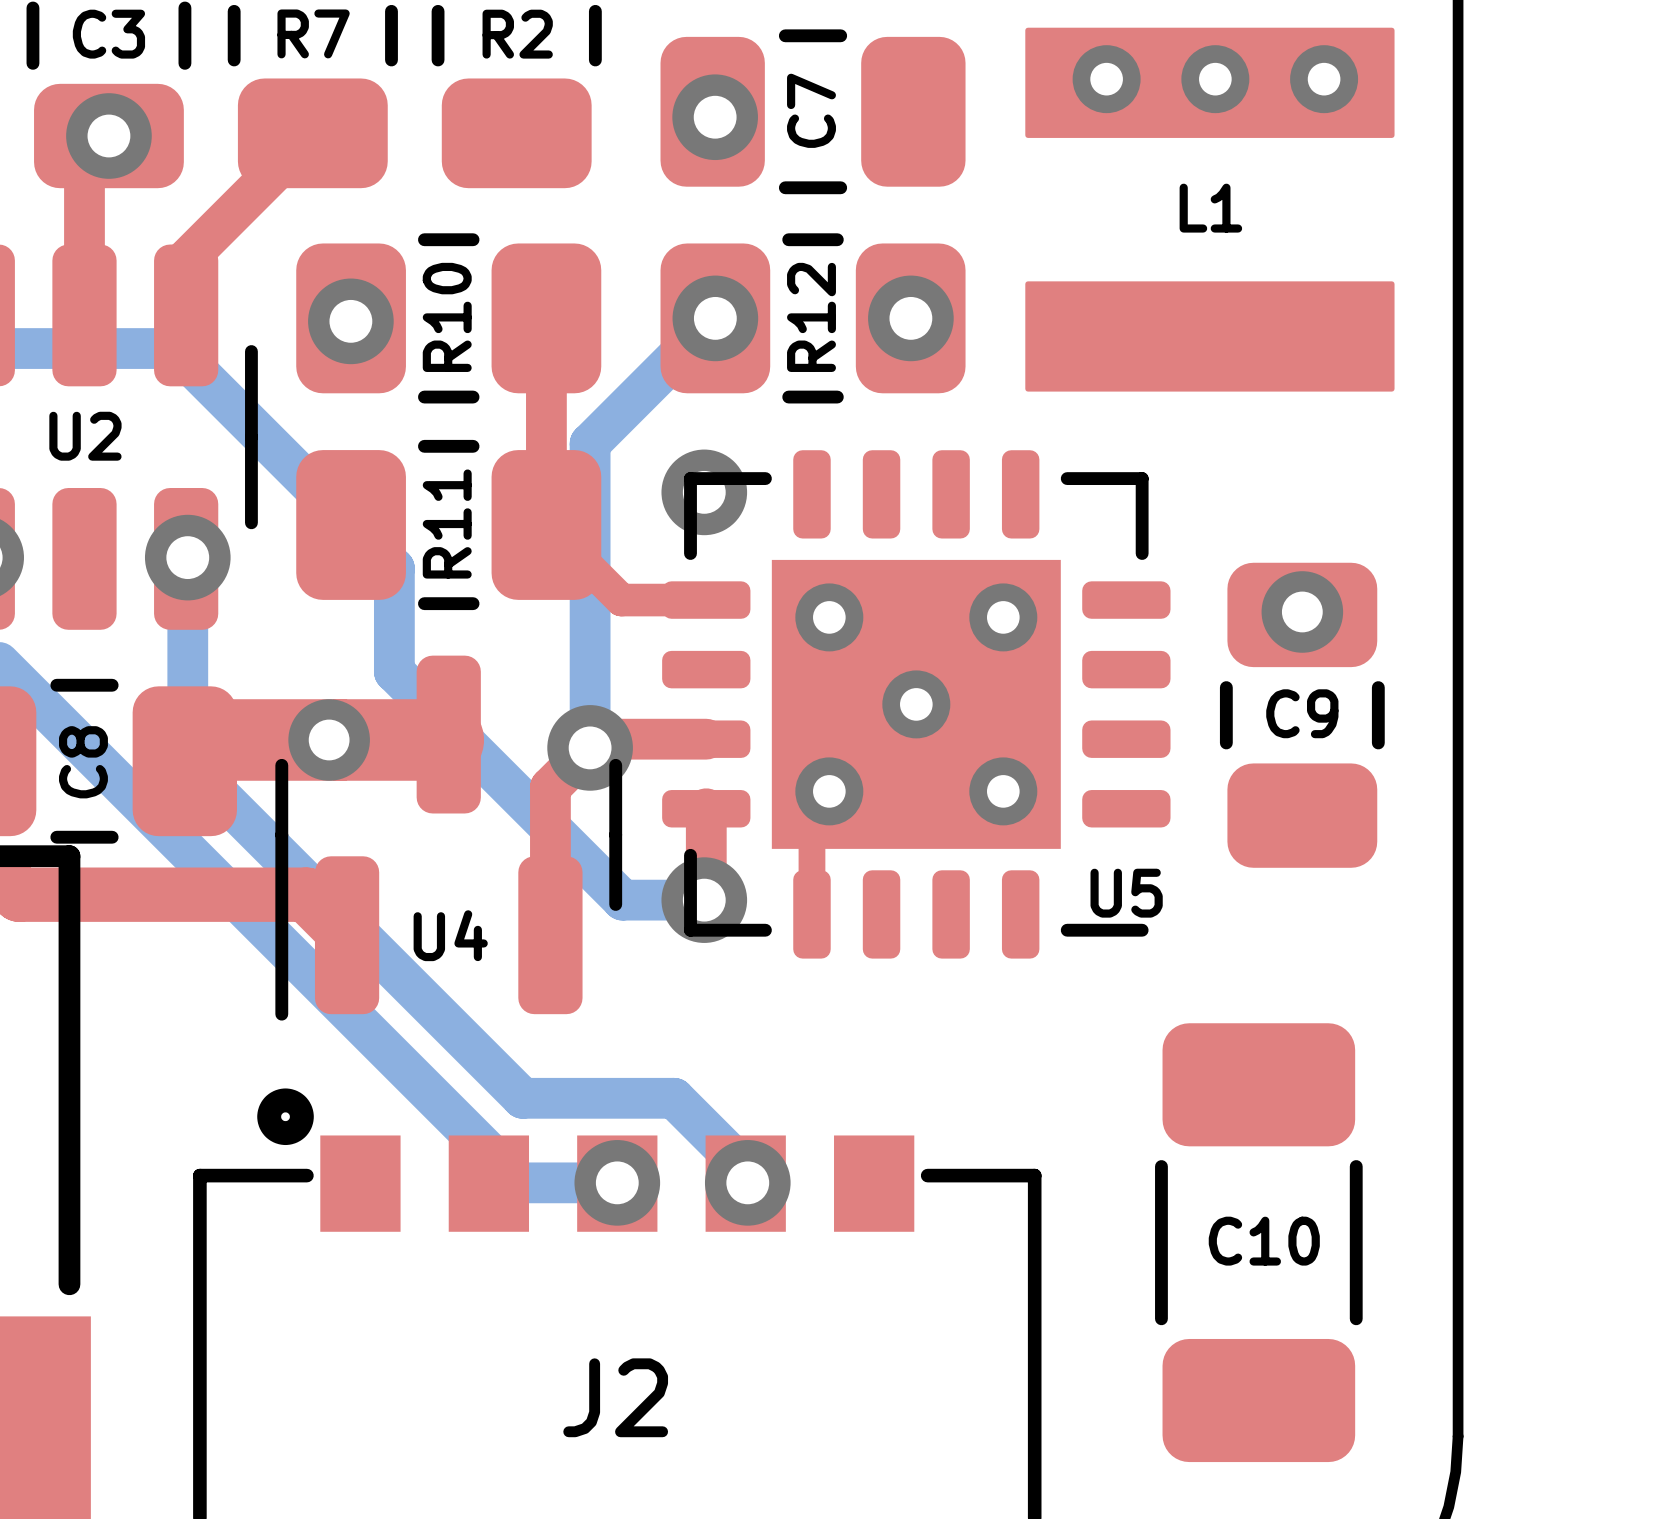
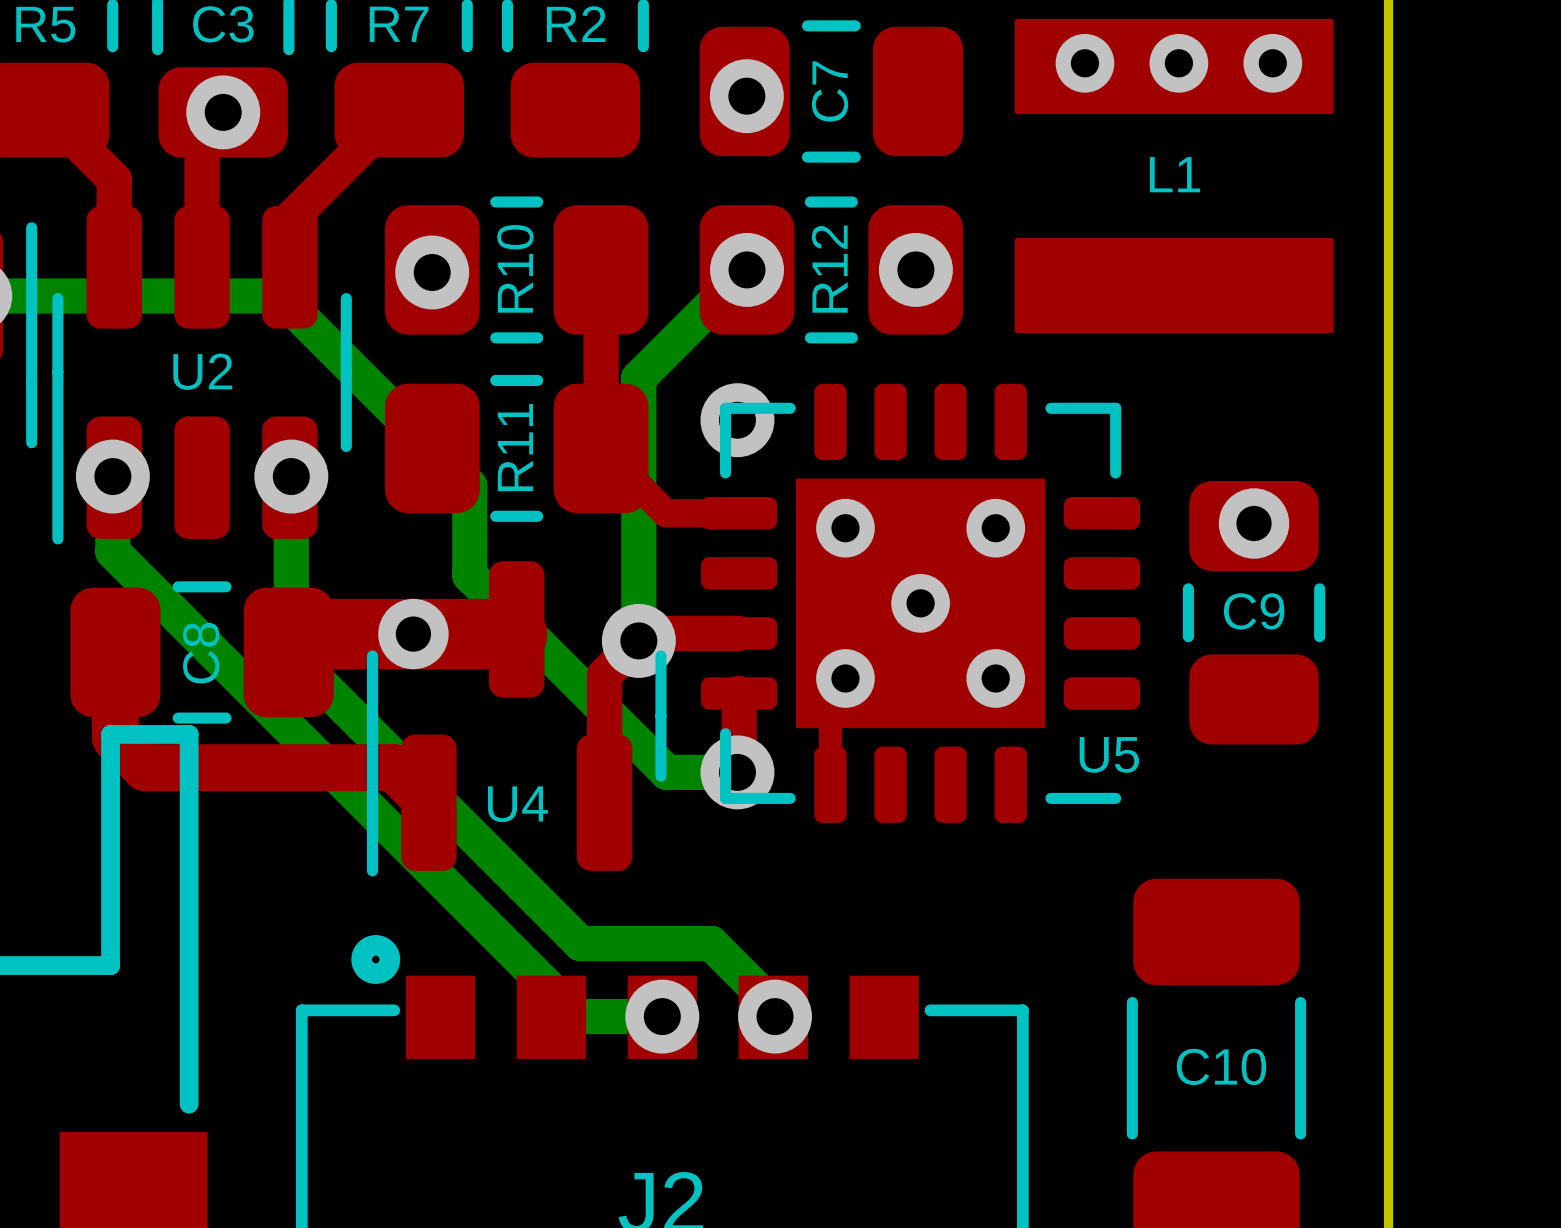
U5 name position: U5 (1126, 893) -> U5 (1109, 754)

